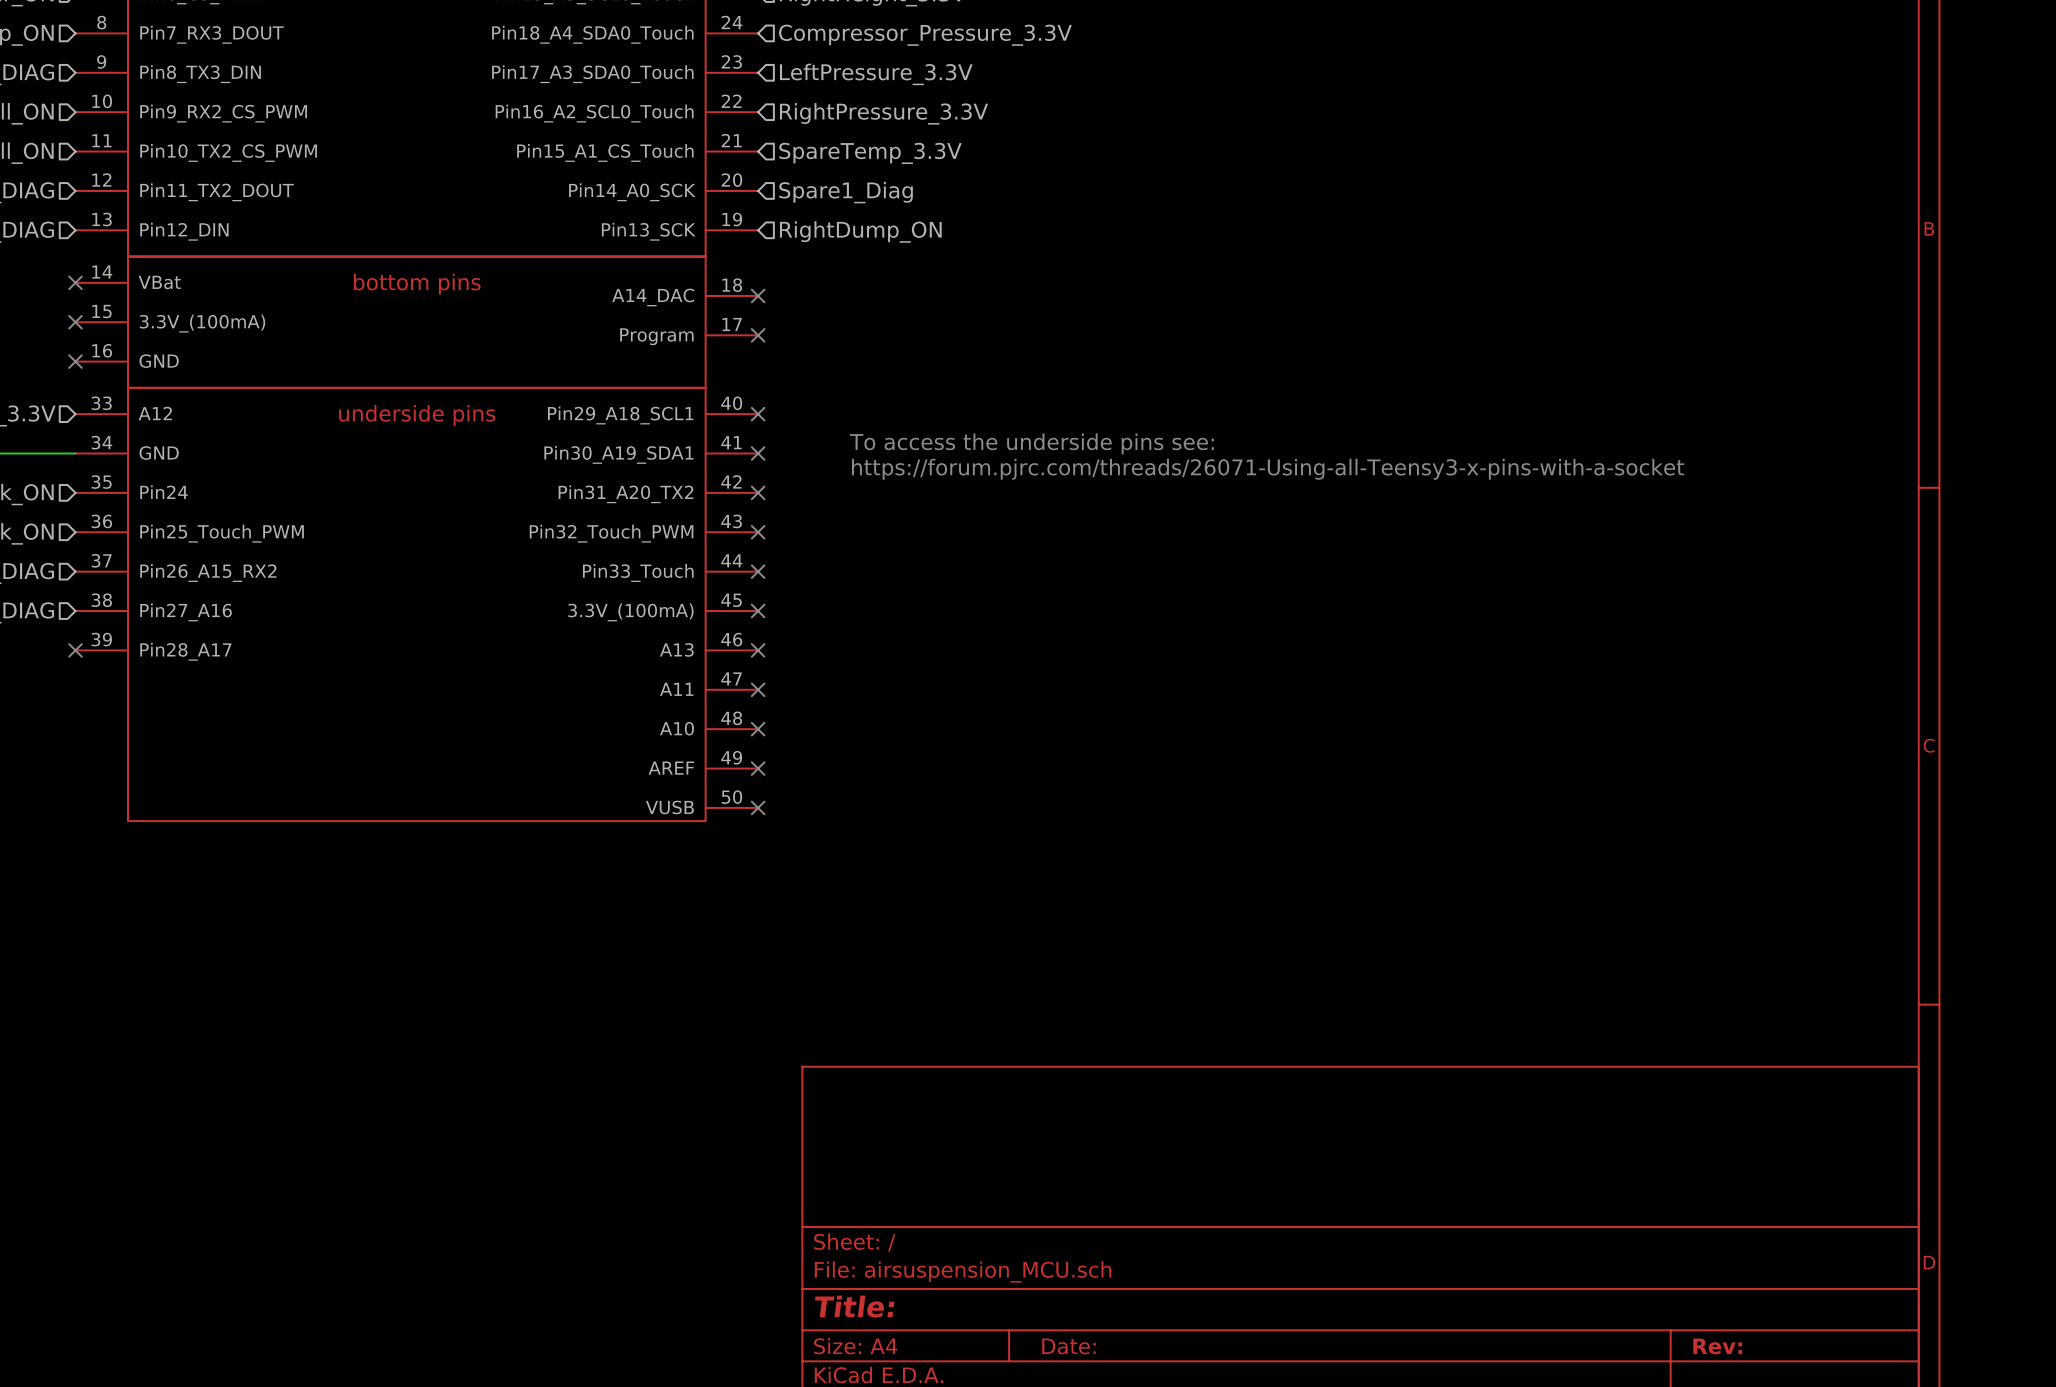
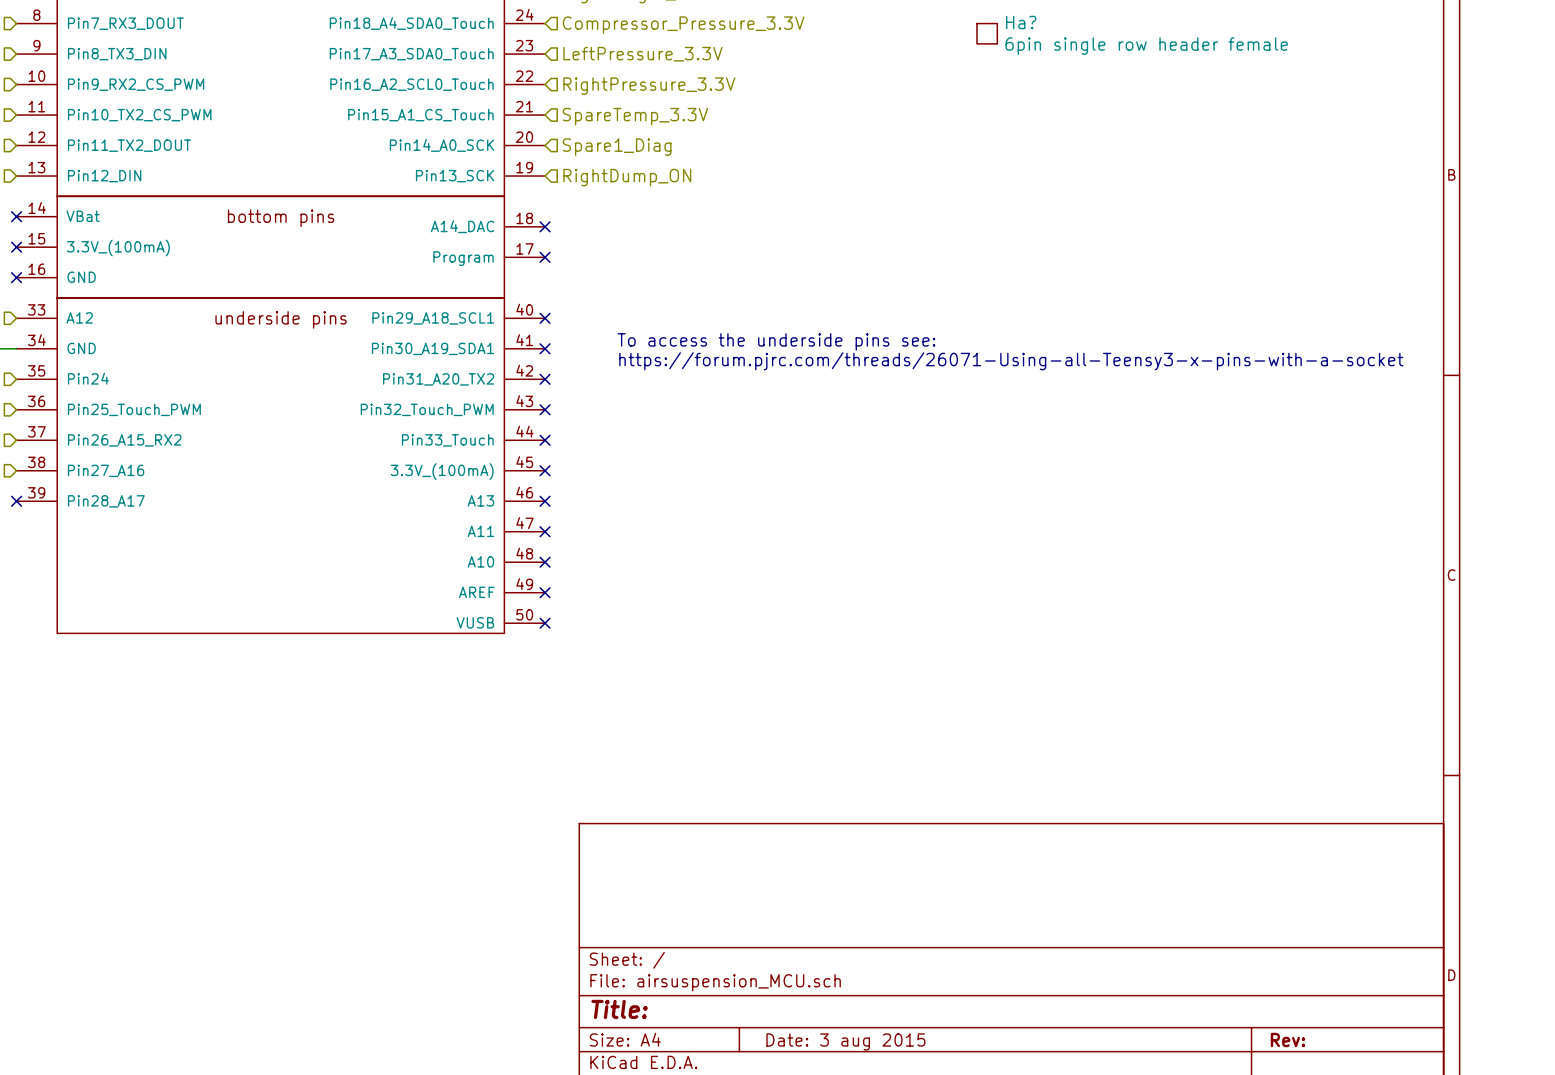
Ha?: none -> 6pin single row header female (987, 33)
title block: Date: (1068, 1346) -> Date: 3 aug 2015 (845, 1042)

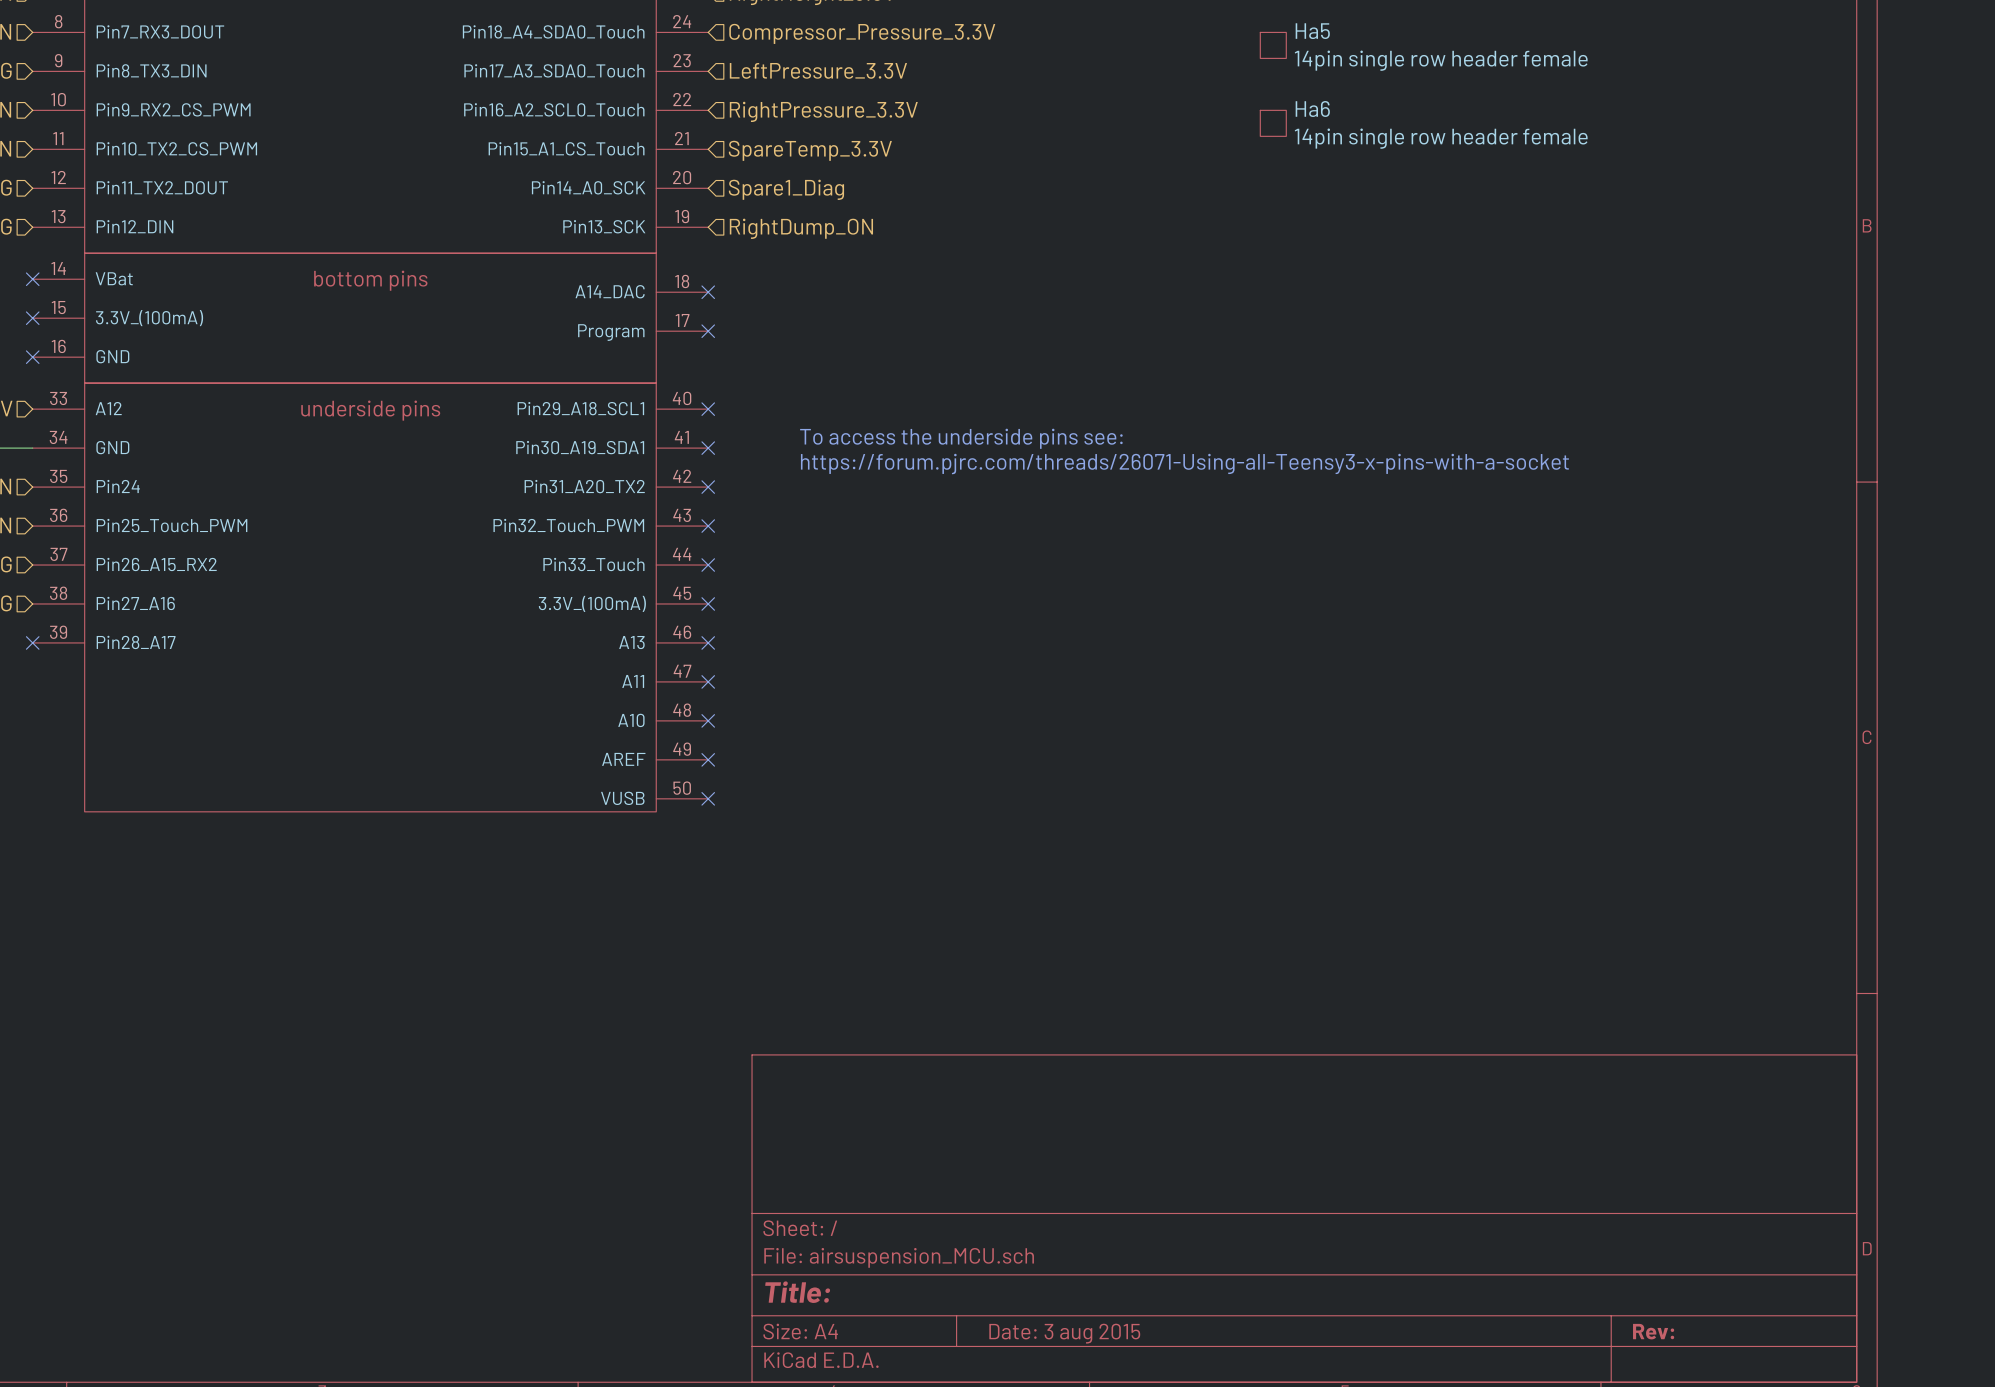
Ha? name: Ha? (1021, 22) -> Ha5 (1312, 31)
Ha? value: 6pin single row header female (1146, 46) -> 14pin single row header female (1441, 60)
Ha6: none -> 14pin single row header female (1273, 123)

